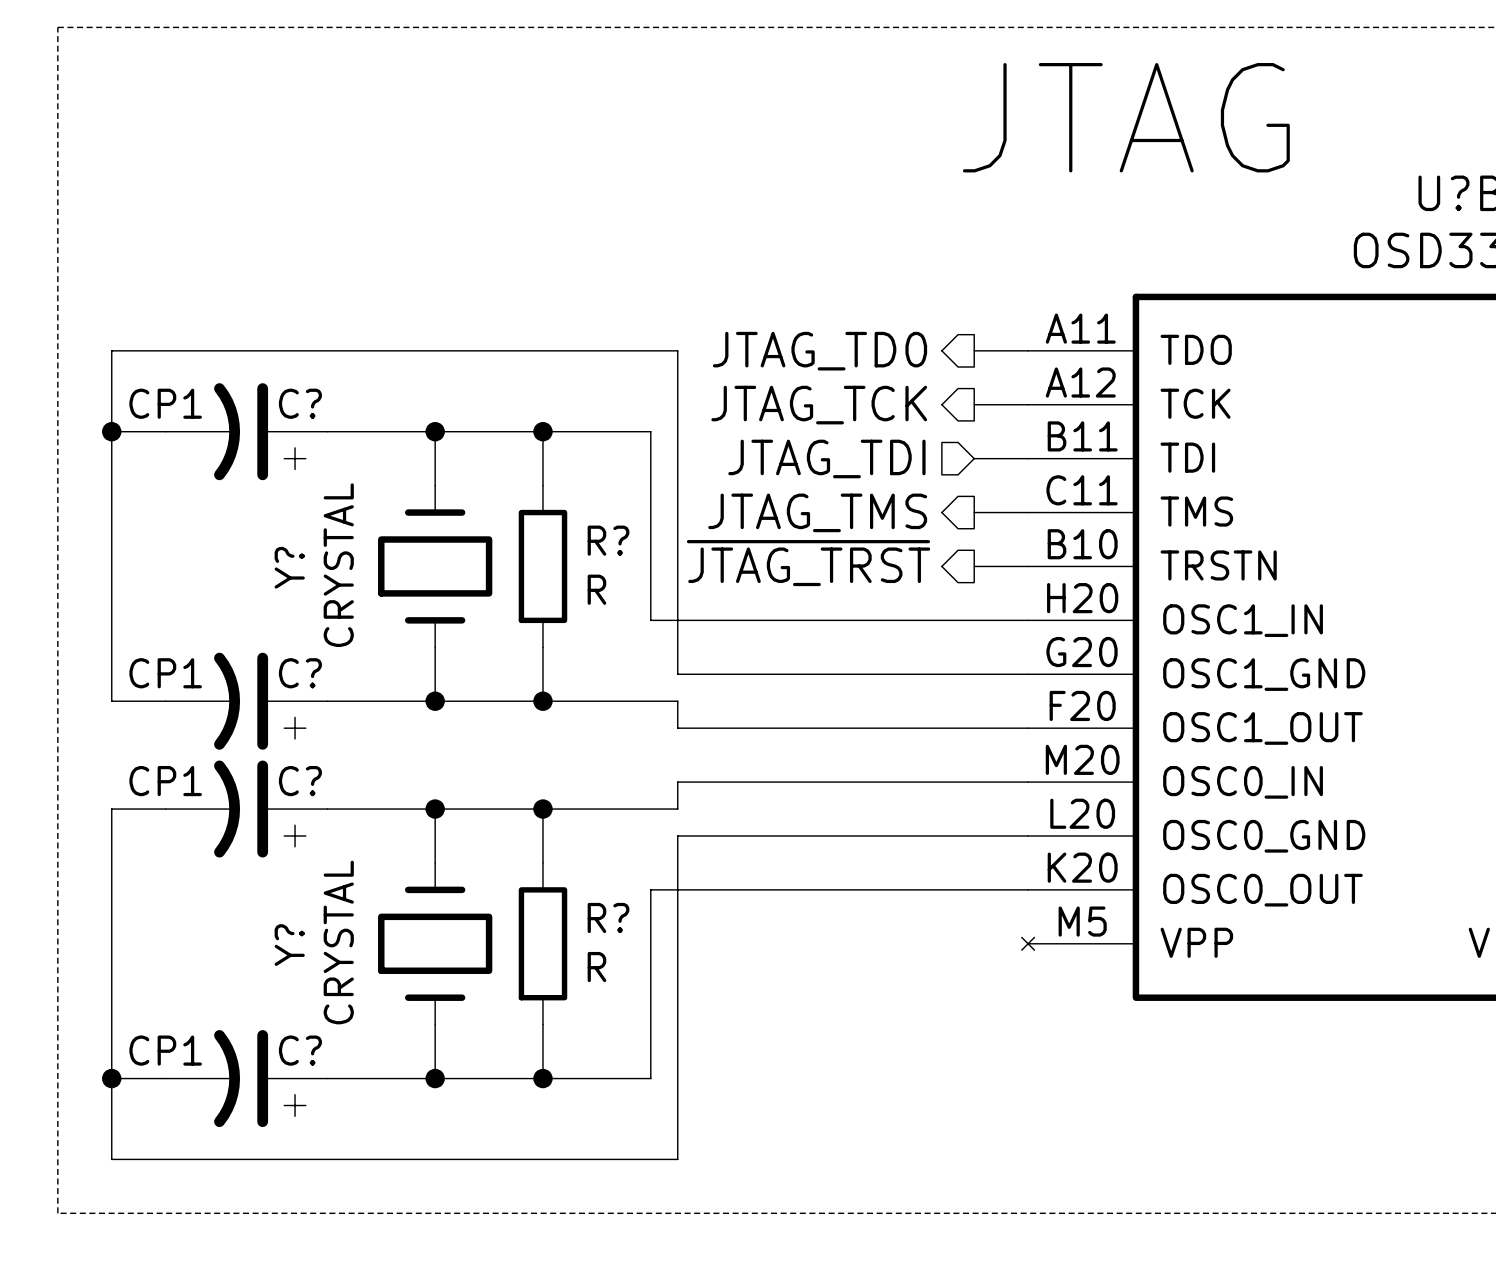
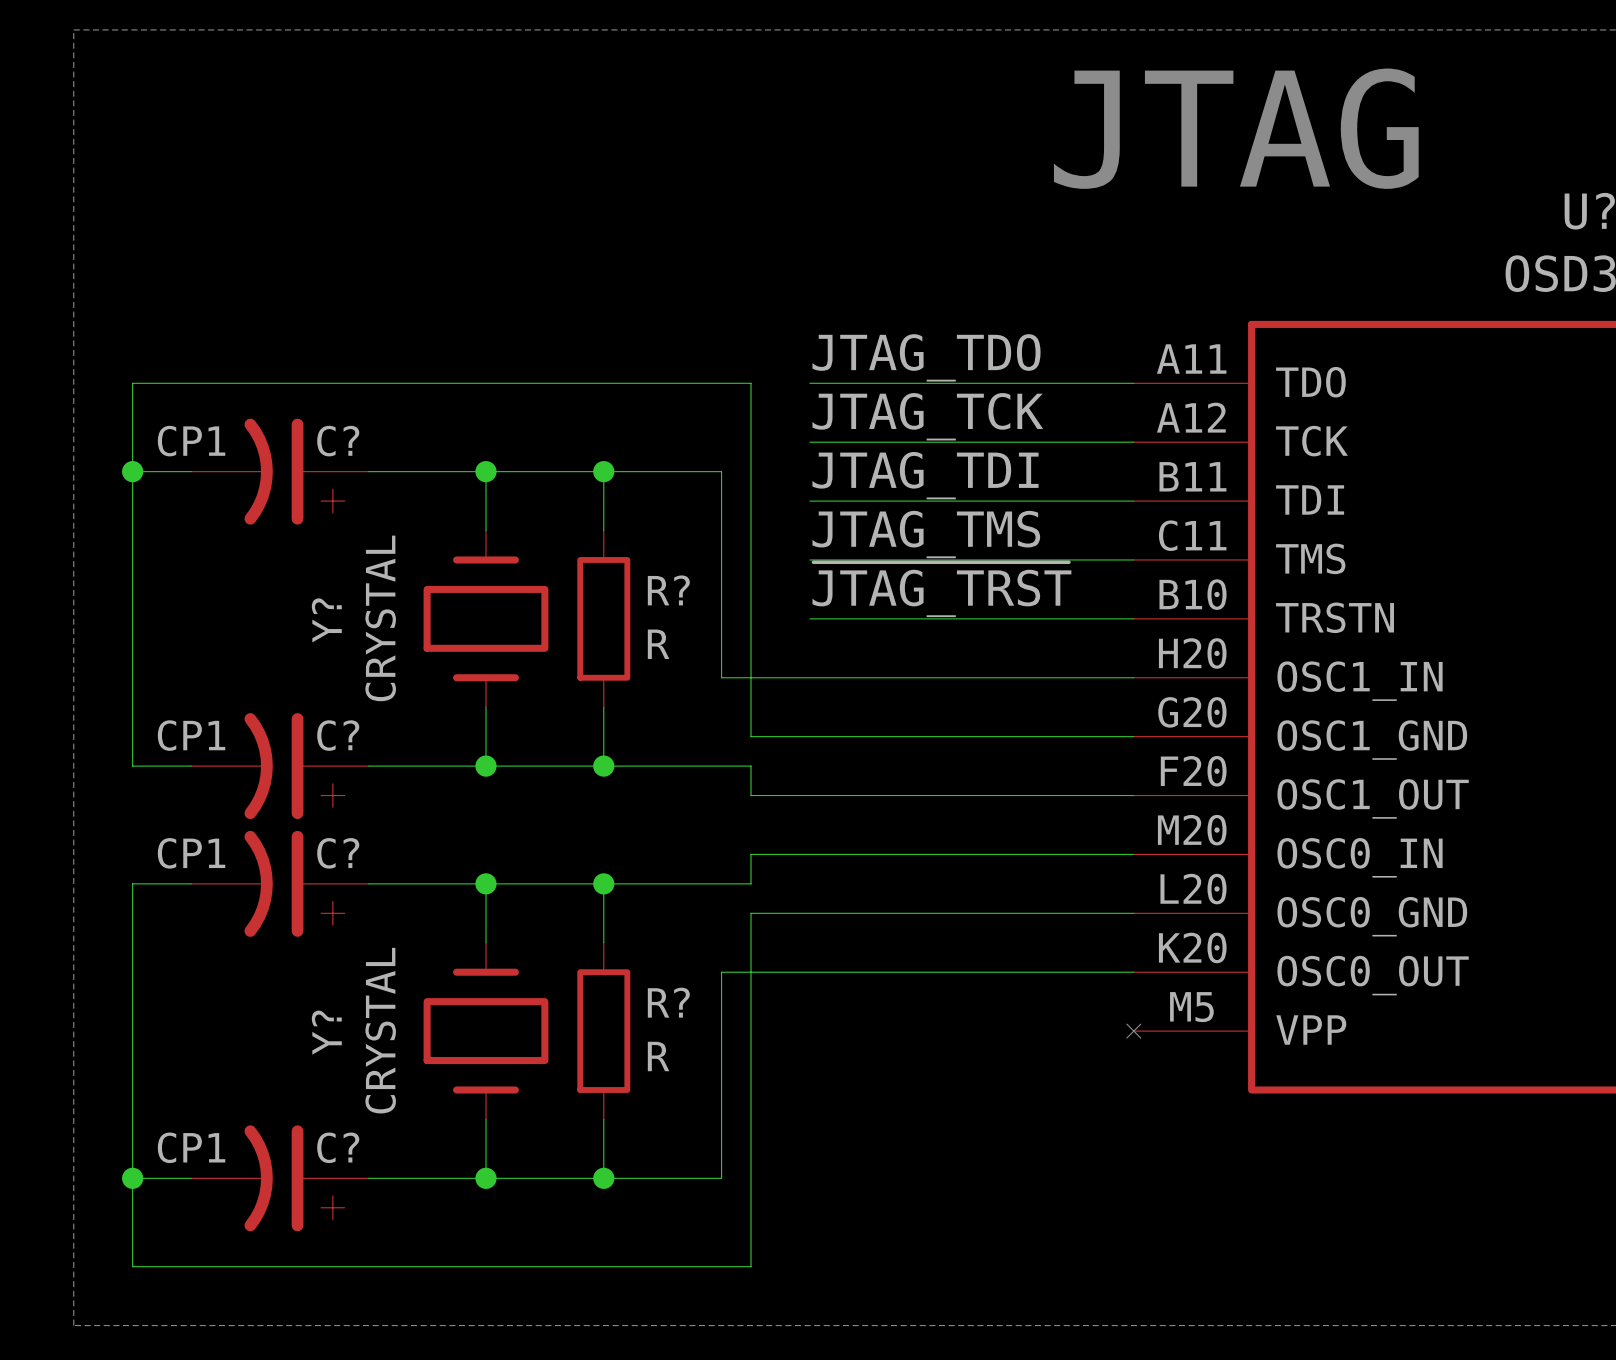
label: none -> JTAG_TDO (926, 357)
wire: none -> (809, 383) (1074, 383)
hierarchical label: JTAG_TD0 (820, 351) -> none
label: none -> JTAG_TCK (927, 416)
wire: none -> (809, 442) (1074, 442)
hierarchical label: JTAG_TCK (819, 405) -> none
label: none -> JTAG_TDI (925, 475)
wire: none -> (809, 501) (1074, 501)
hierarchical label: JTAG_TDI (826, 458) -> none
label: none -> JTAG_TMS (926, 534)
wire: none -> (809, 559) (1074, 559)
hierarchical label: JTAG_TMS (817, 512) -> none
label: none -> ~{JTAG_TRST} (941, 589)
hierarchical label: ~{JTAG_TRST} (808, 563) -> none
wire: none -> (809, 618) (1074, 618)

